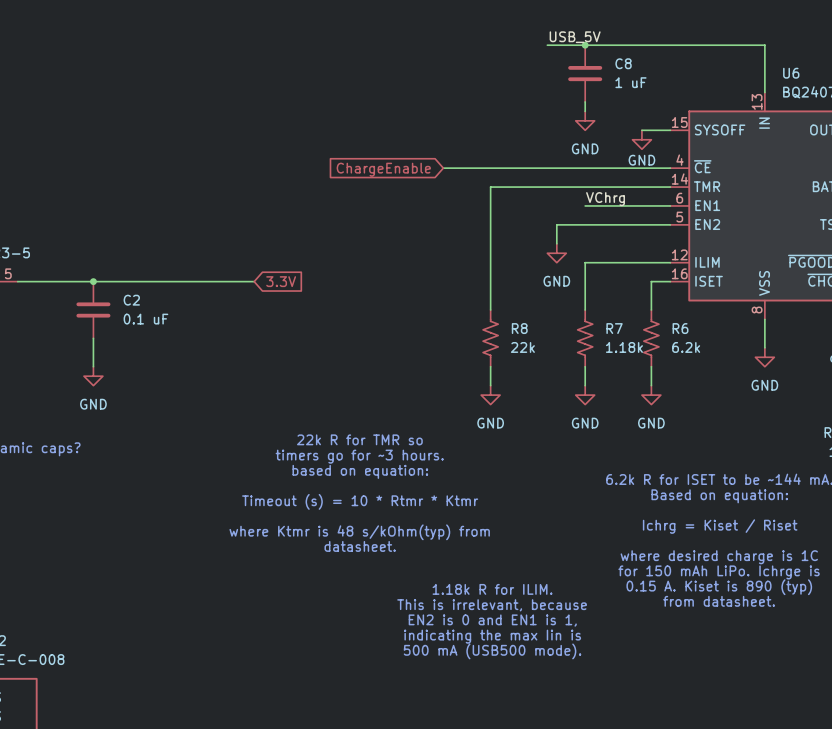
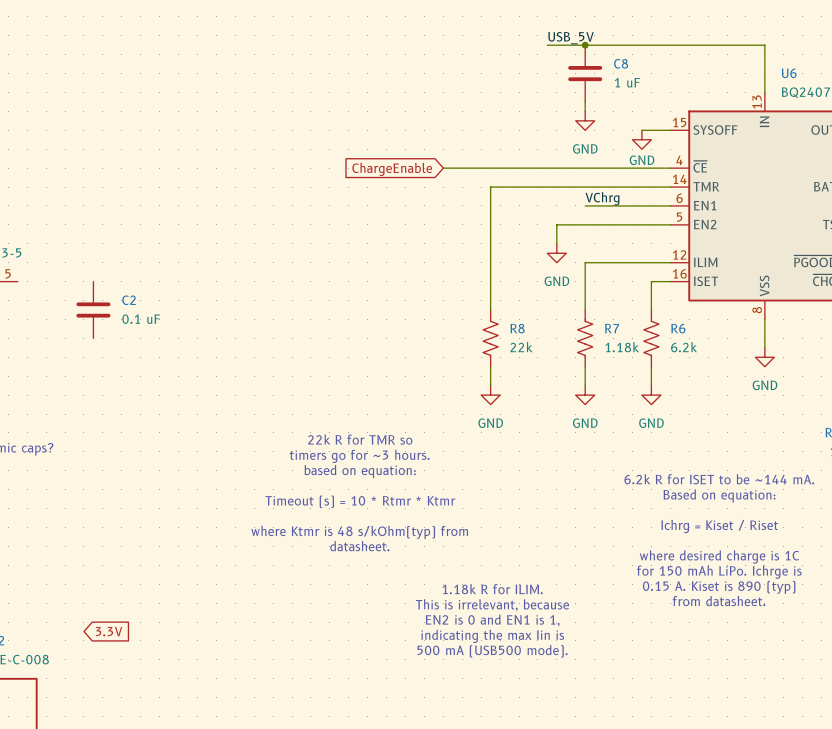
wire: (17, 281) (254, 281) -> none
junction: (93, 281) -> none
global label: 3.3V (281, 281) -> none
wire: (93, 338) (93, 366) -> none
power symbol: GND (93, 376) -> none
global label: none -> 3.3V (109, 631)

